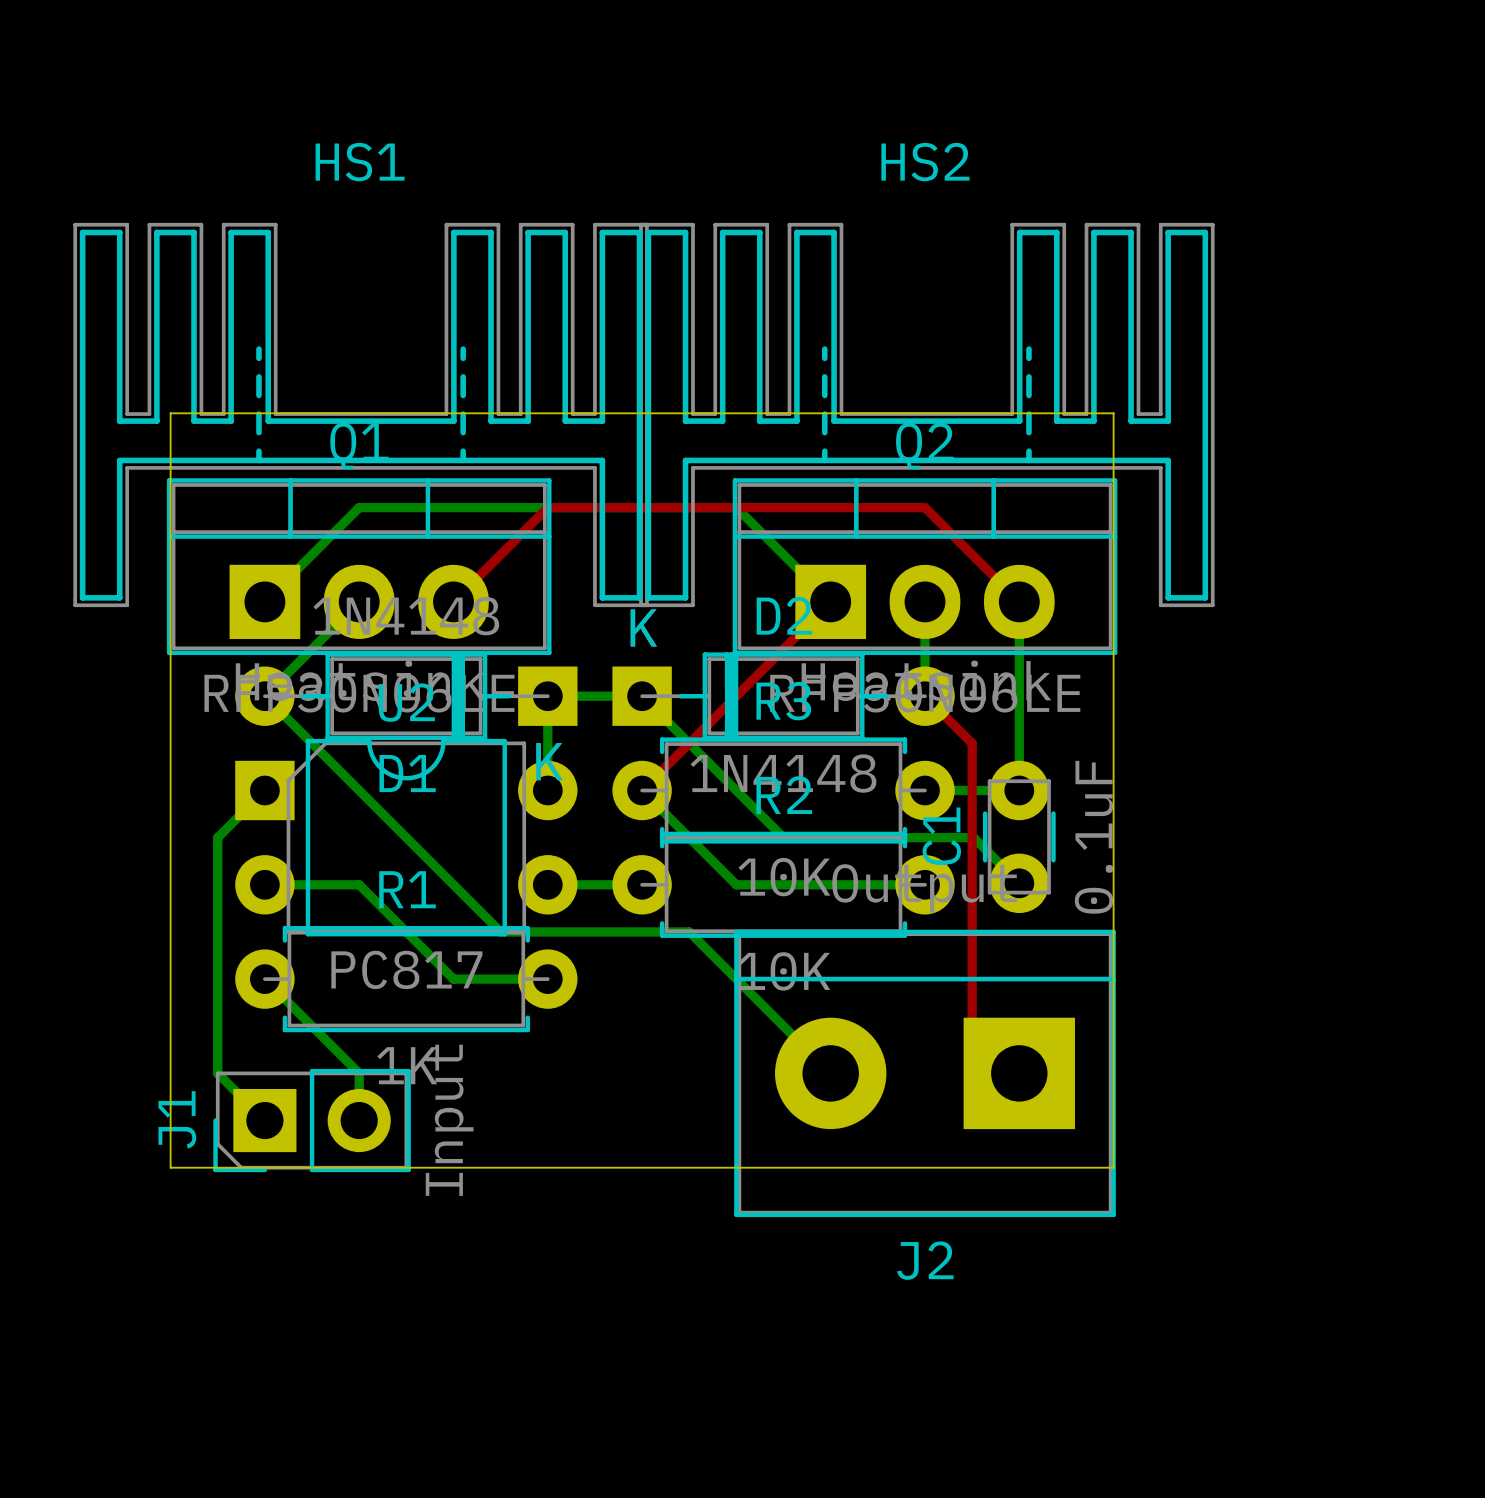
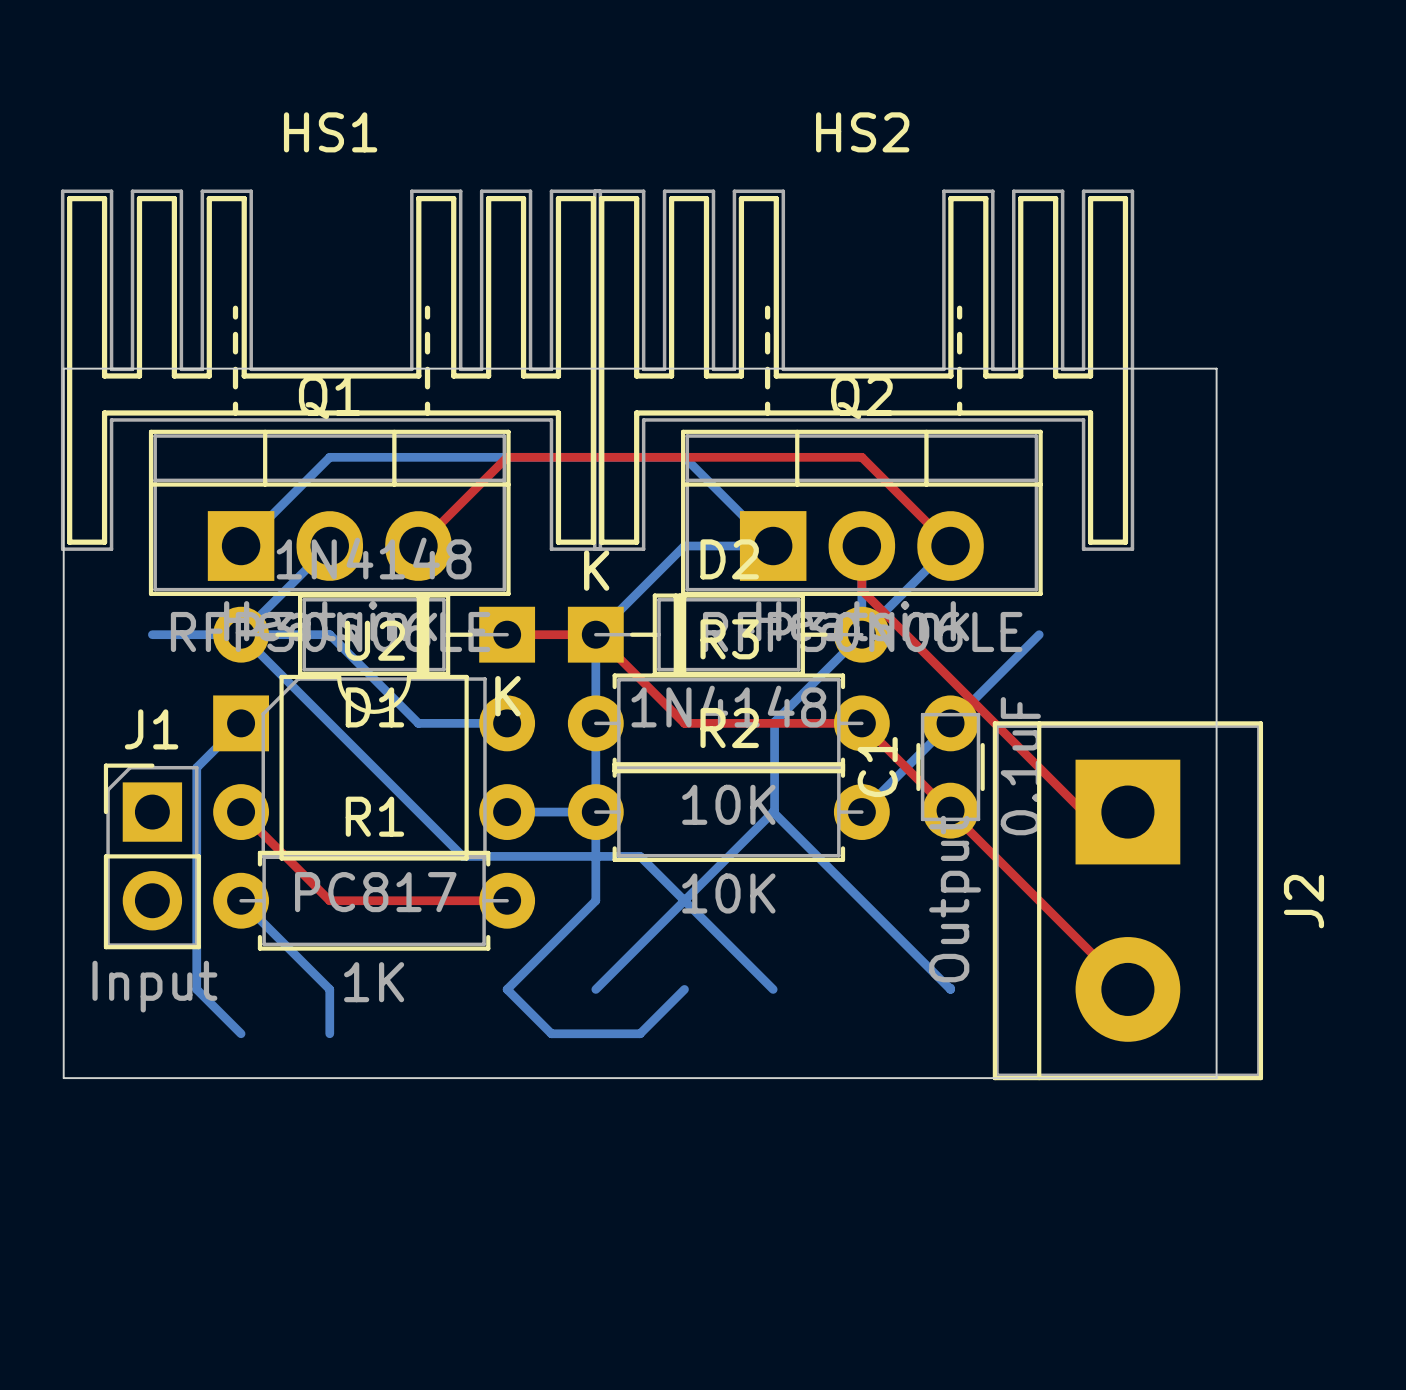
board edge: (170, 413) (170, 1167) -> (152, 368) (63, 368) (63, 1078) (152, 1078)
board edge: (1113, 413) (1113, 1167) -> (1039, 368) (1216, 368) (1216, 1078) (1039, 1078)
bottom track: none -> (773, 546) (684, 546) (595, 634) (595, 900) (507, 989) (551, 1033) (640, 1033) (684, 989)
top track: (830, 601) (642, 790) -> none
top track: none -> (861, 546) (861, 590) (1083, 812)
bottom track: (1019, 601) (1019, 790) (923, 791) -> (950, 546) (774, 721) (774, 813) (950, 988)
top track: none -> (507, 634) (595, 634) (684, 723) (861, 723) (1127, 989)
top track: (925, 696) (972, 743) (972, 1026) (1019, 1073) -> none
bottom track: (547, 790) (547, 696) (642, 696) (783, 837) (973, 837) (1019, 883) (1017, 884) -> (507, 723) (418, 723) (329, 634) (152, 634)
bottom track: (642, 790) (736, 884) (830, 884) -> (595, 989) (773, 812)
bottom track: (264, 884) (359, 884) (453, 979) (547, 979) -> none
top track: none -> (241, 812) (329, 900) (507, 900)
bottom track: (832, 884) (925, 884) -> (1039, 634) (861, 812)
J2 rotation: 0° (925, 1073) -> 90° counterclockwise (1127, 900)
J2 position: (925, 1073) -> (1127, 900)
J1 rotation: 0° (312, 1120) -> 90° clockwise (152, 856)
J1 position: (312, 1120) -> (152, 856)

